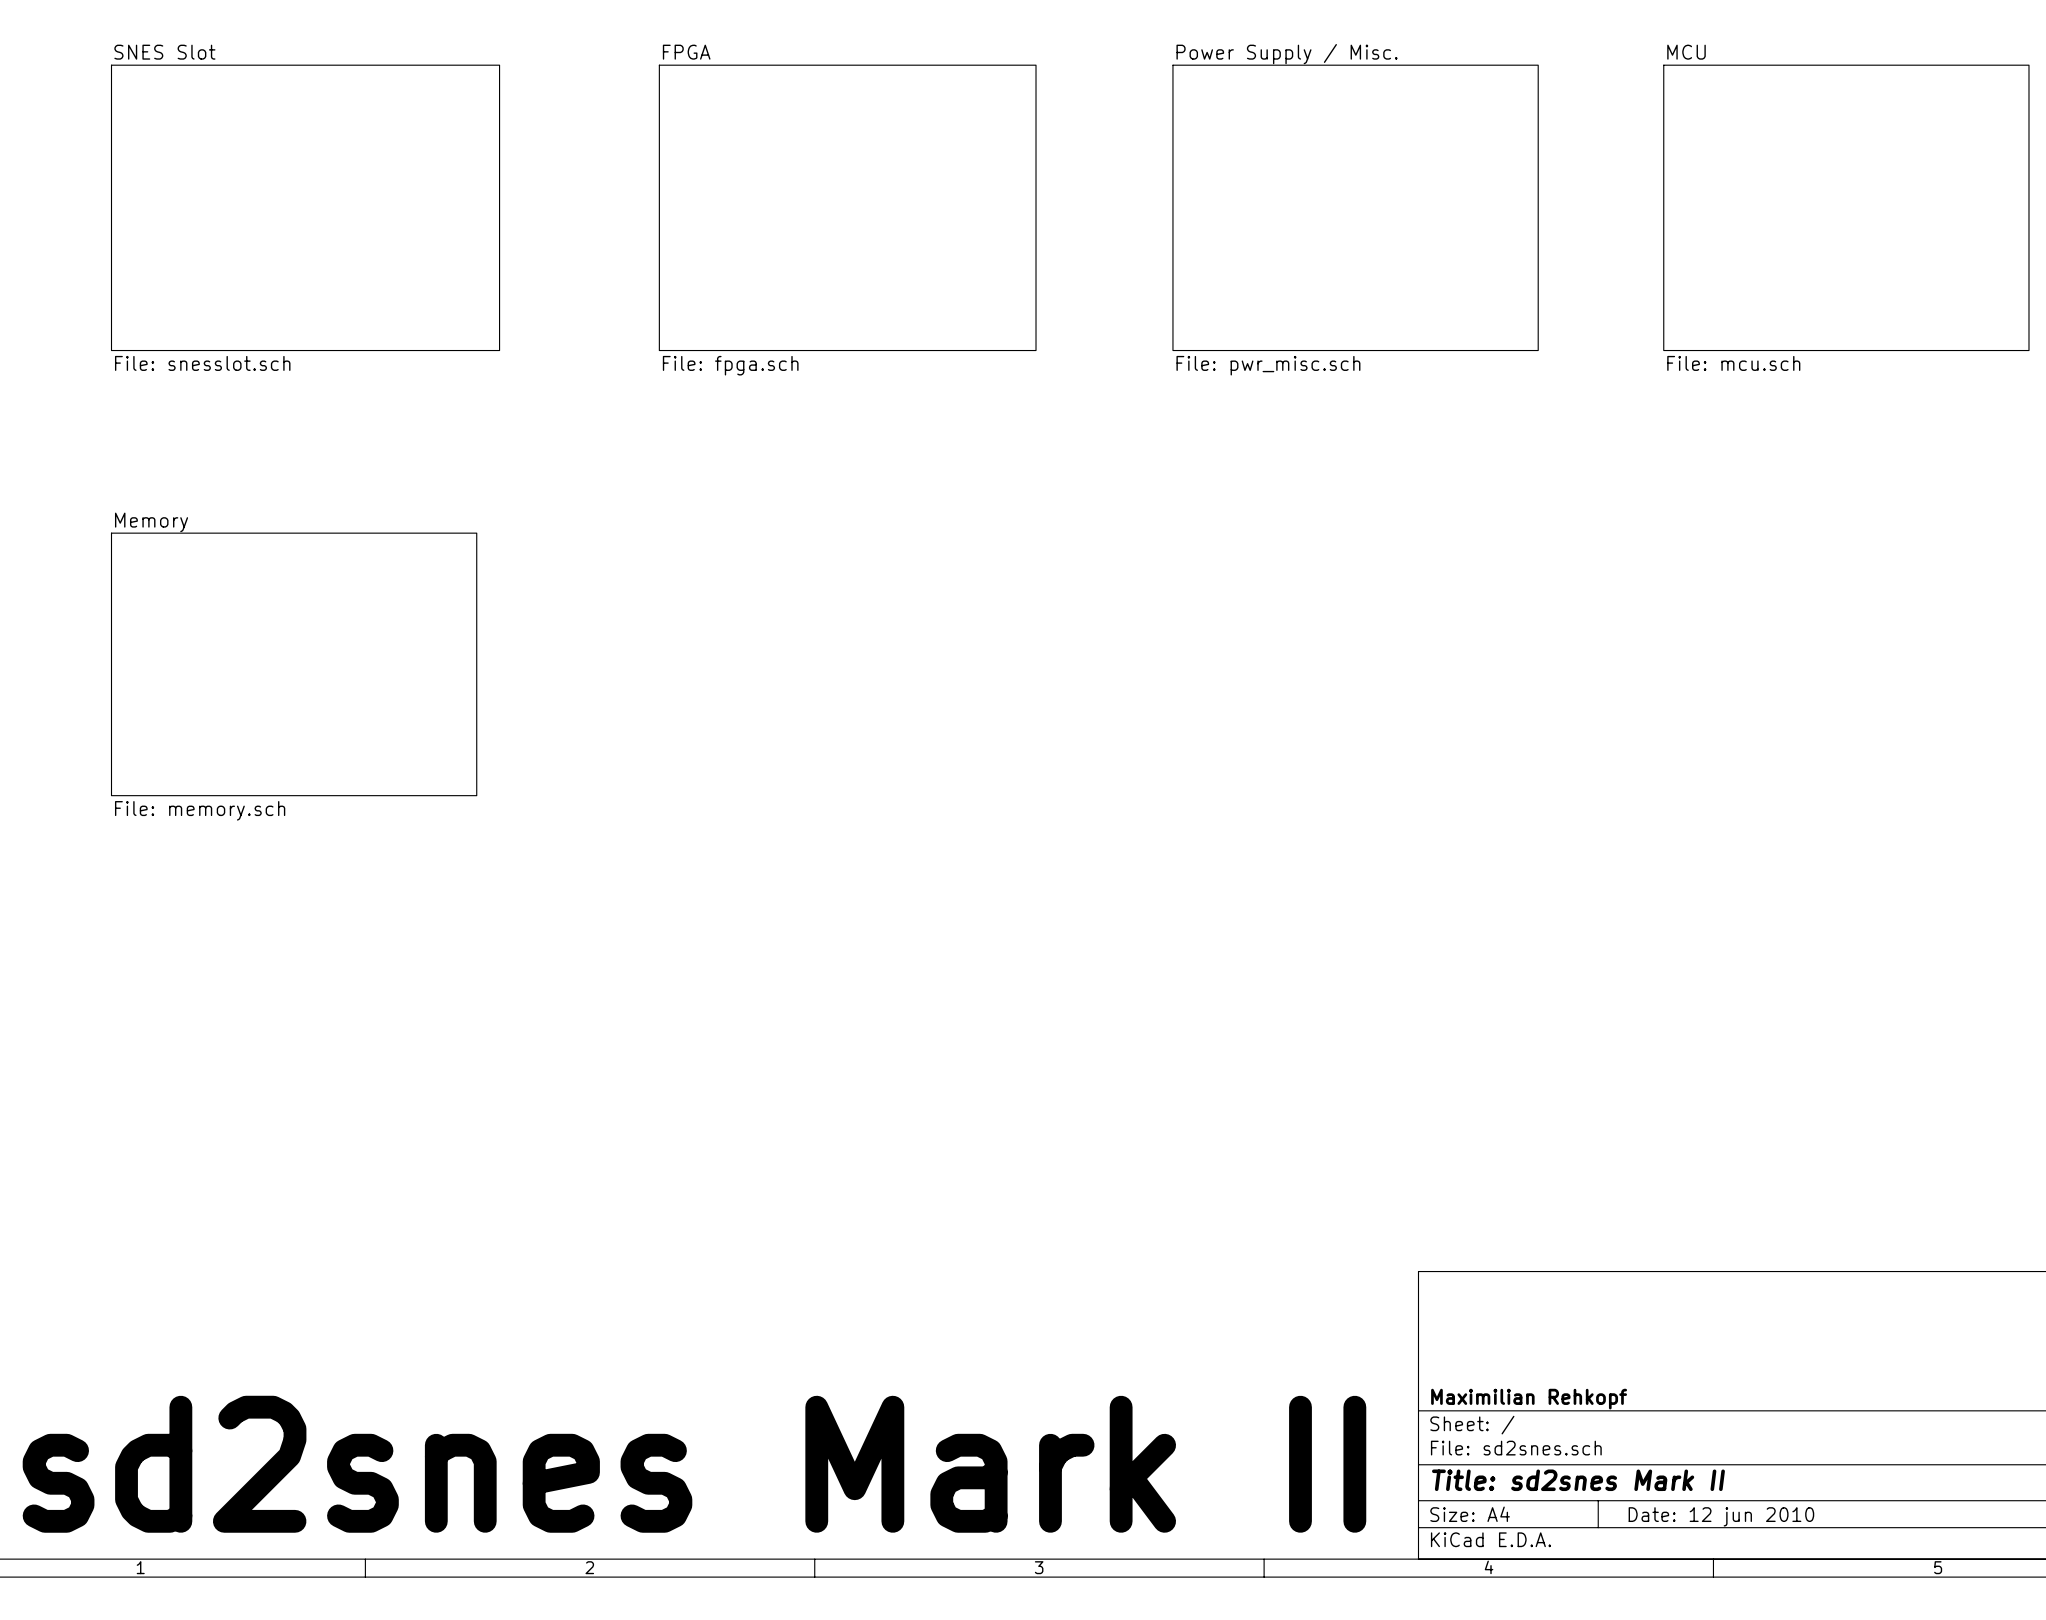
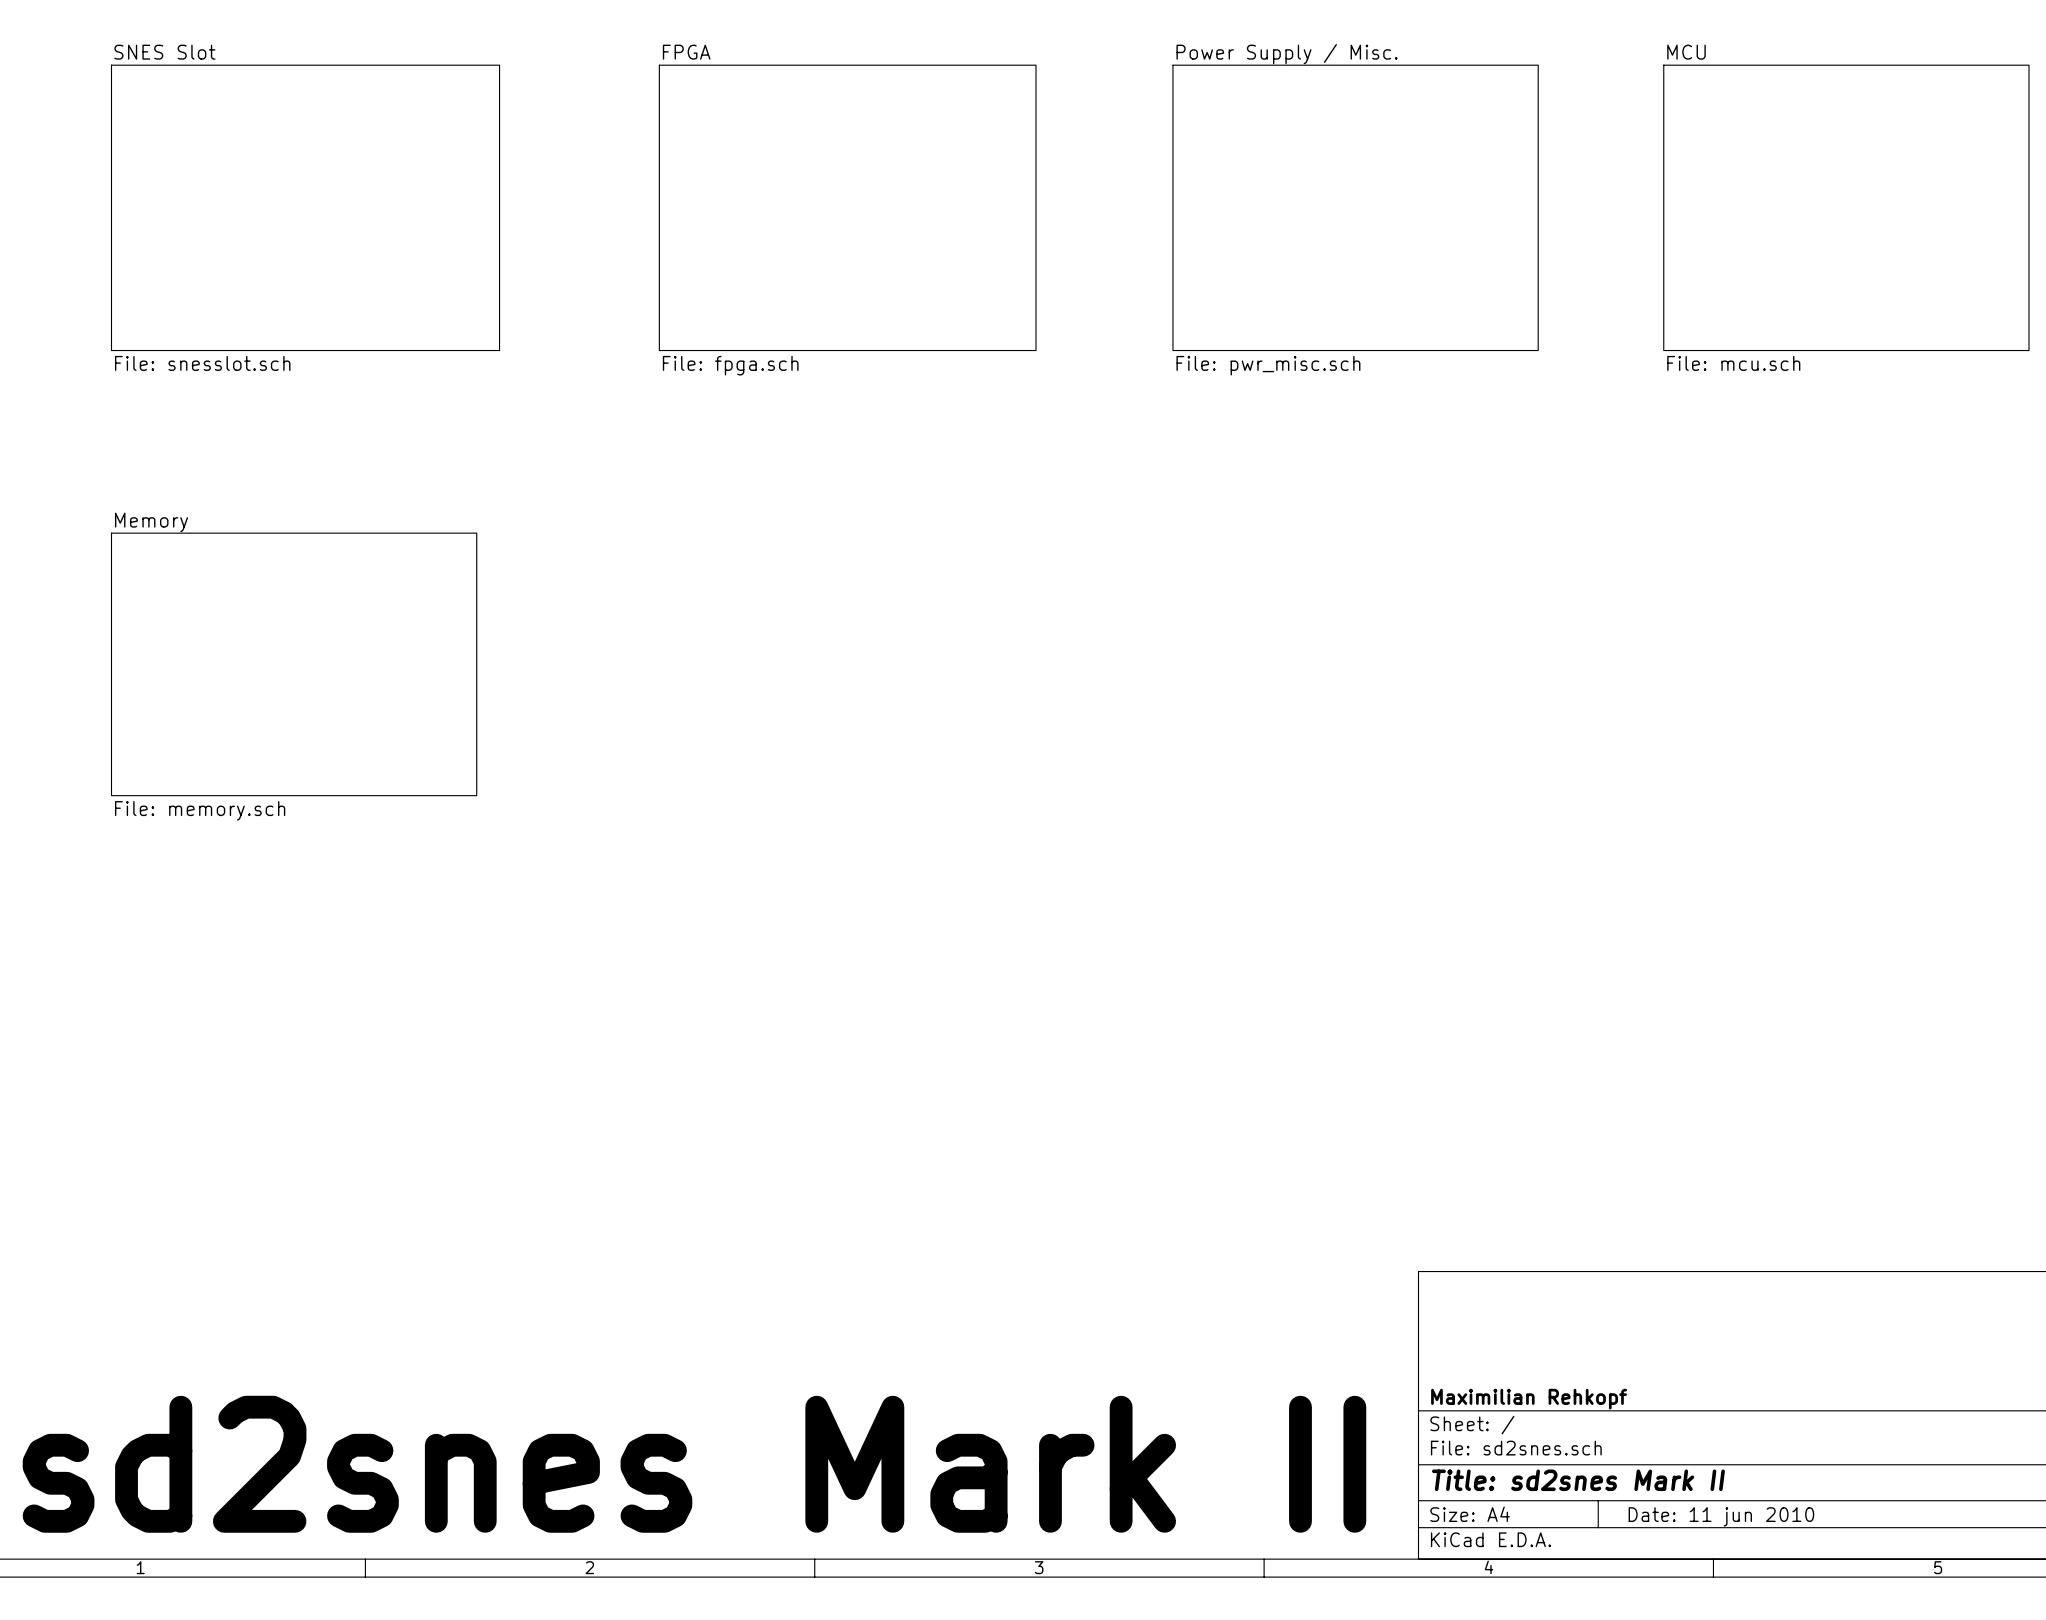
title block: Date: 12 jun 2010 (1721, 1516) -> Date: 11 jun 2010 (1721, 1516)

